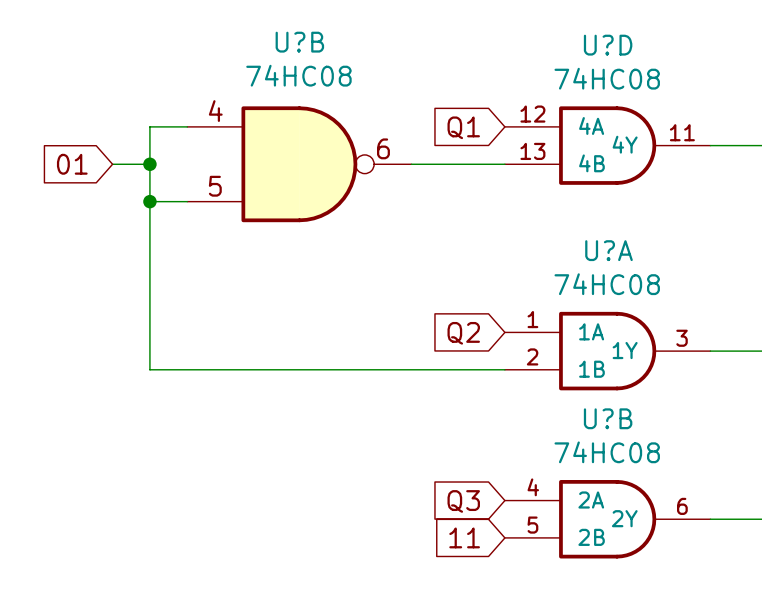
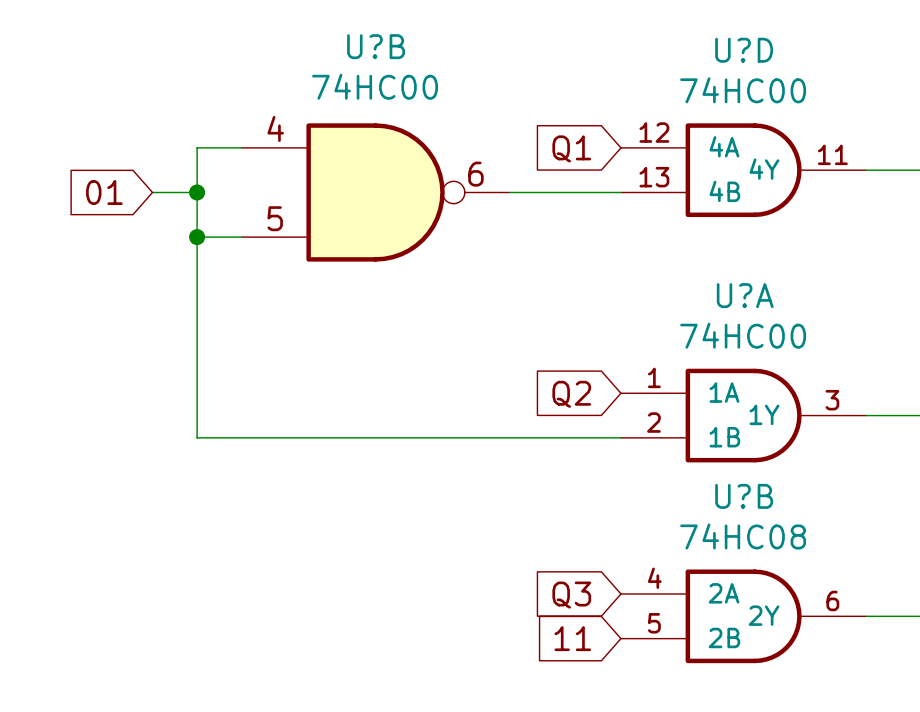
U?B value: 74HC08 (298, 75) -> 74HC00 (375, 86)
U?D value: 74HC08 (607, 78) -> 74HC00 (743, 90)
U?A value: 74HC08 (607, 284) -> 74HC00 (743, 335)

